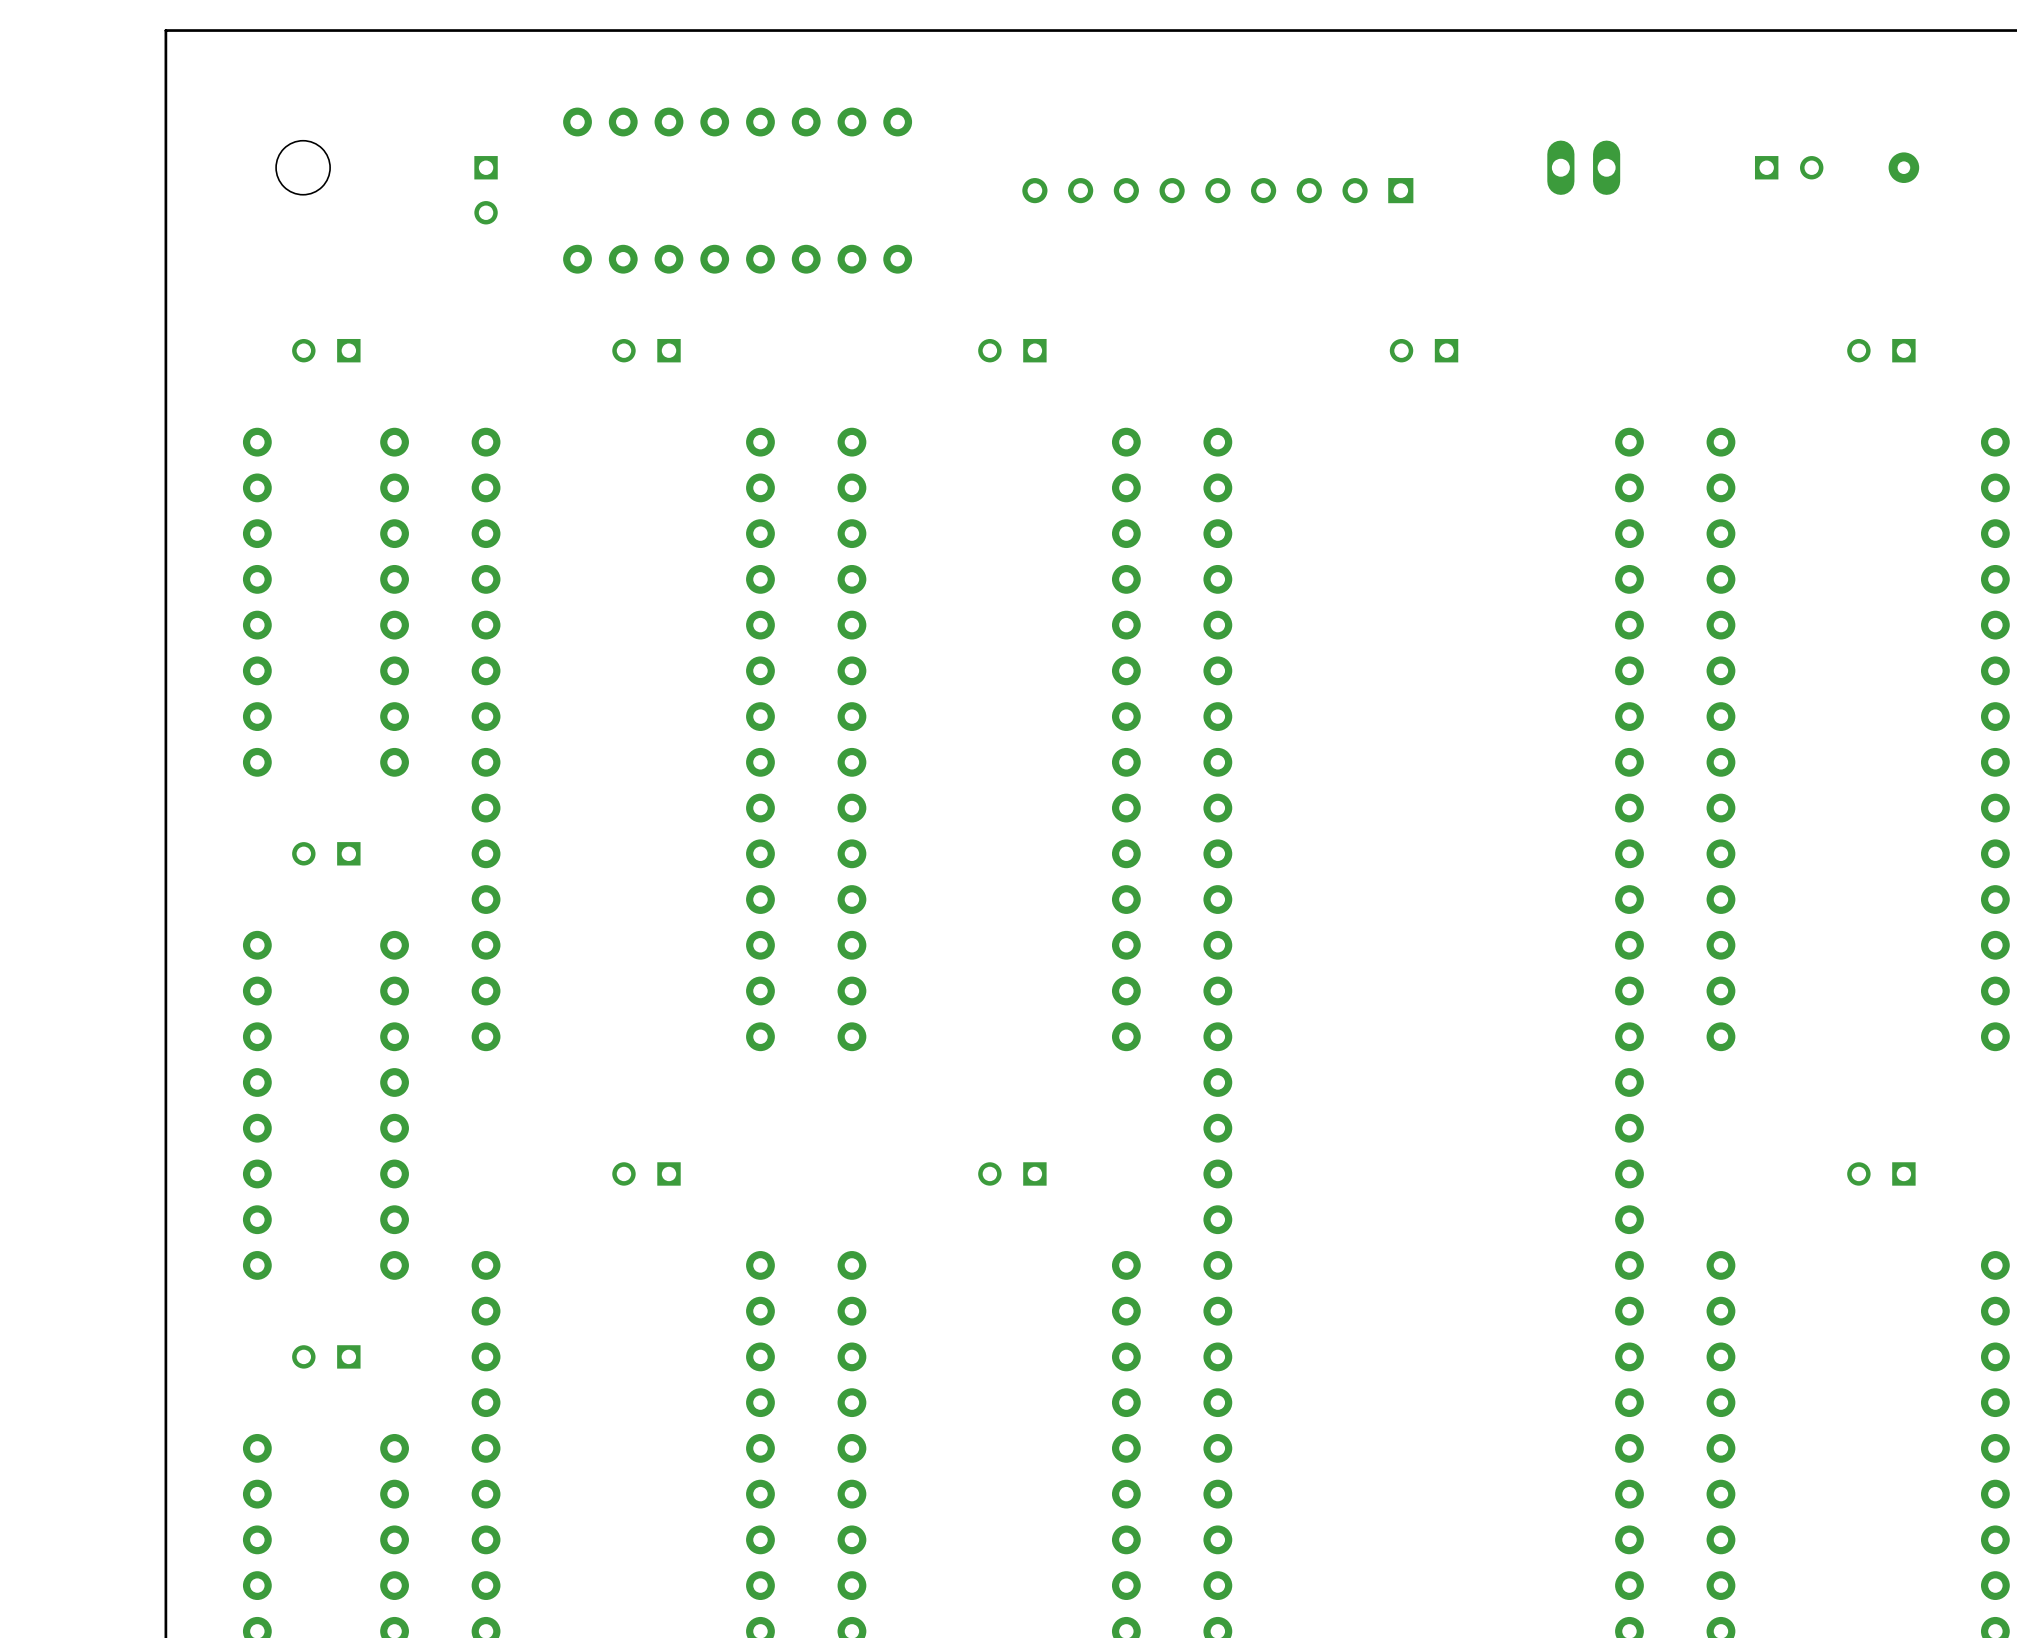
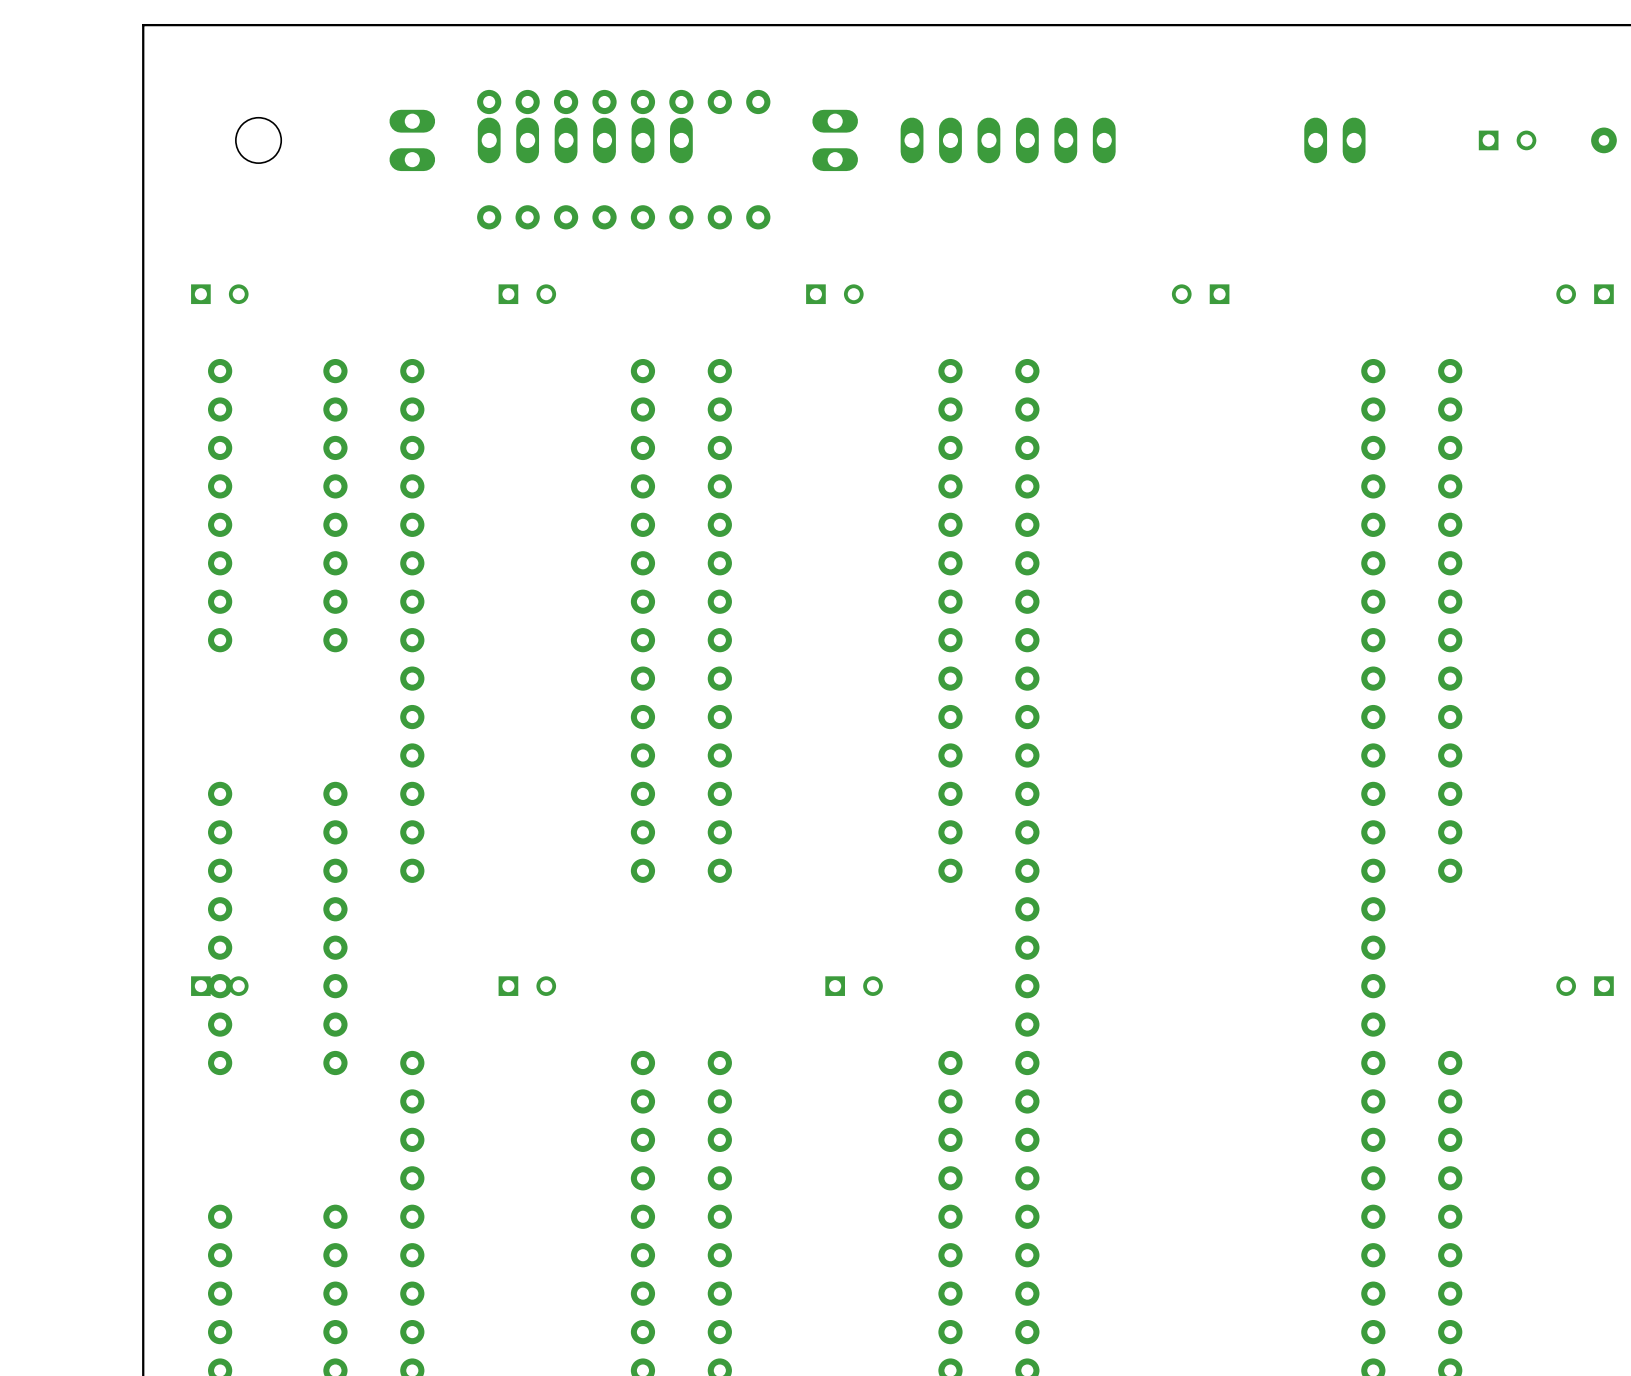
part: none -> (412, 140)
part: none -> (585, 140)
part: none -> (835, 140)
part: none -> (1008, 140)
part: (486, 190) -> none
part: (1217, 190) -> none
part rotation: 0° (326, 350) -> 180° (219, 294)
part position: (326, 350) -> (219, 294)
part rotation: 0° (646, 350) -> 180° (527, 294)
part rotation: 0° (1012, 350) -> 180° (834, 294)
part: (326, 853) -> none
part: none -> (219, 986)
part rotation: 0° (646, 1173) -> 180° (527, 986)
part rotation: 0° (1012, 1173) -> 180° (854, 986)
part: (326, 1356) -> none

